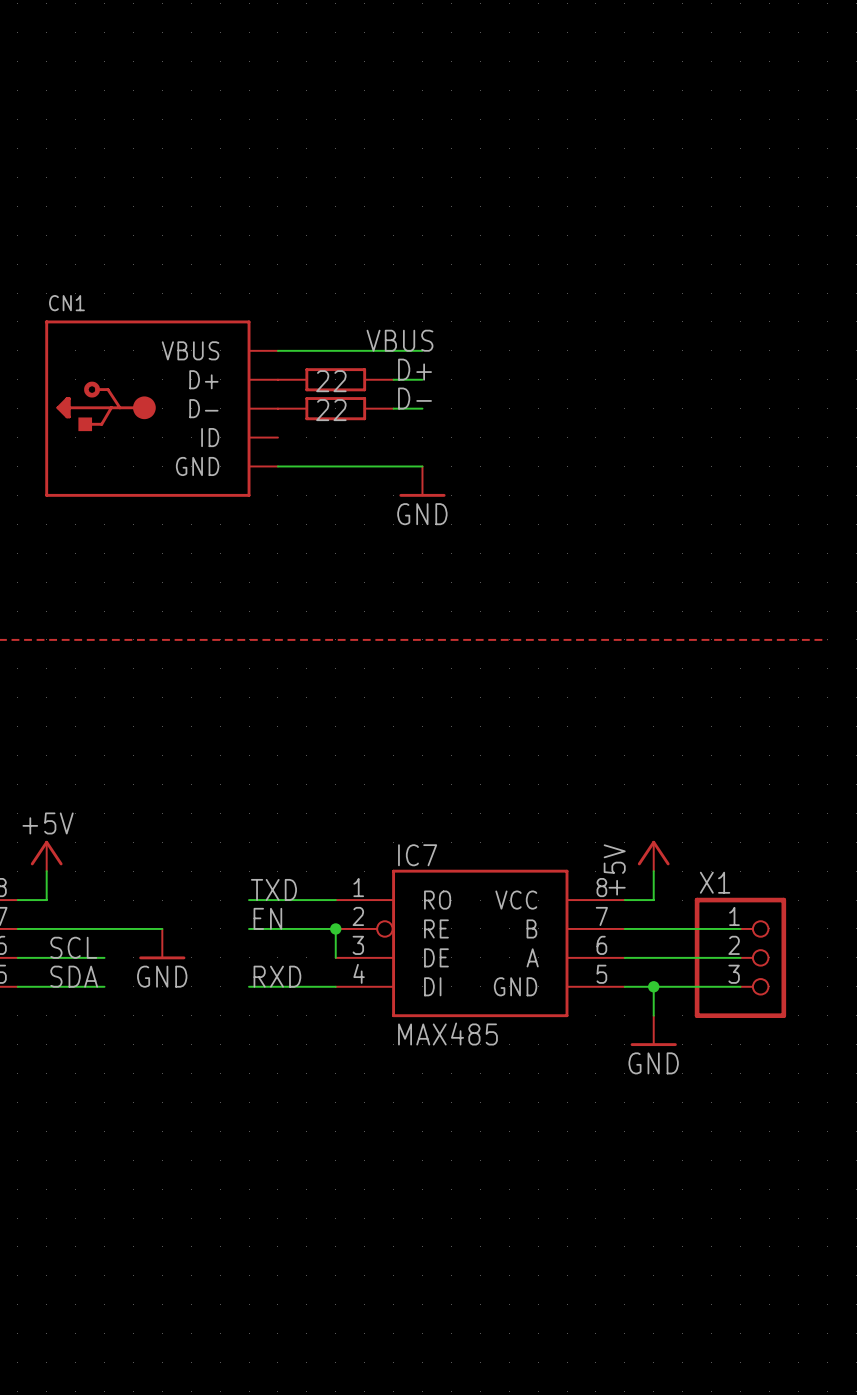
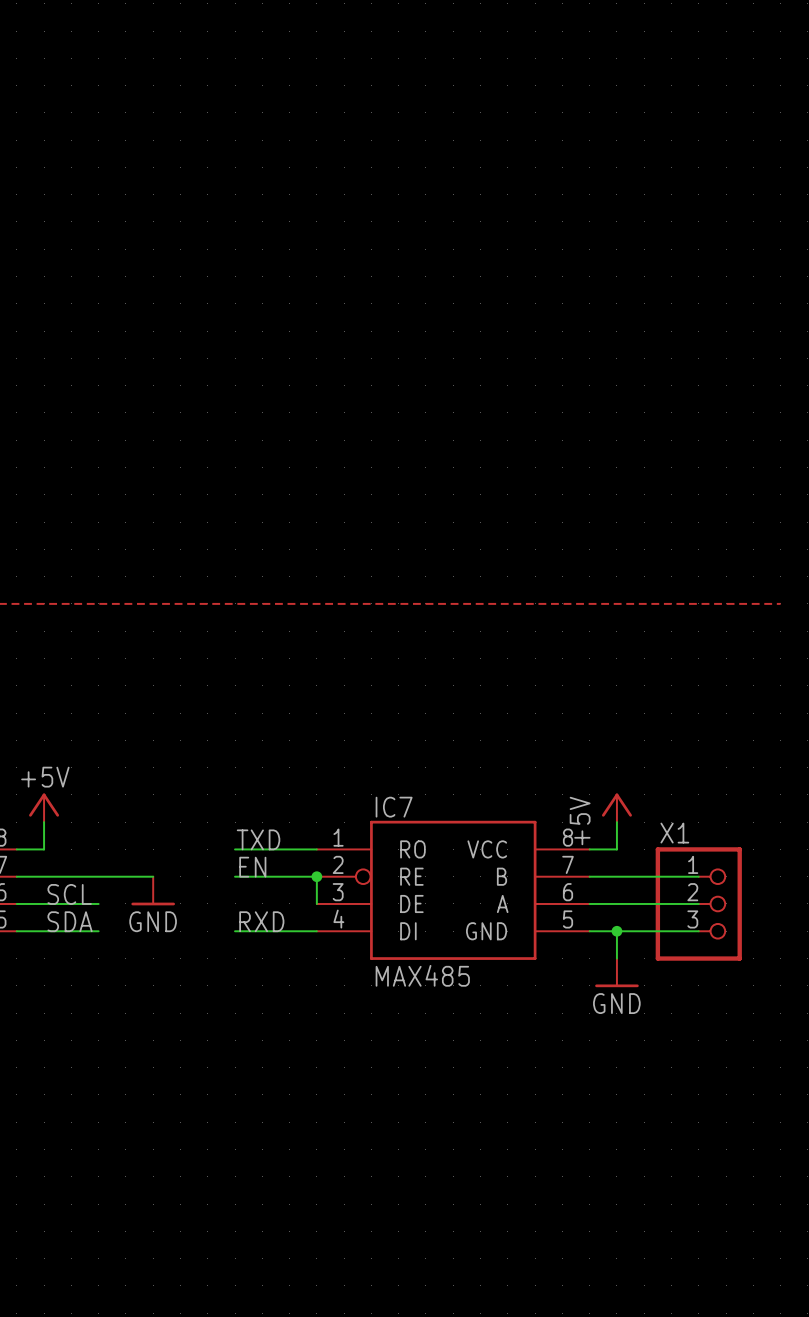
label: VBUS (399, 340) -> none
wire: (277, 350) (422, 350) -> none
label: D+ (415, 369) -> none
part: 22 (335, 379) -> none
wire: (393, 379) (422, 379) -> none
label: D- (415, 398) -> none
CN1: (161, 408) -> none
part: 22 (335, 408) -> none
wire: (393, 408) (422, 408) -> none
wire: (277, 466) (422, 466) -> none
power symbol: GND (422, 481) -> none

